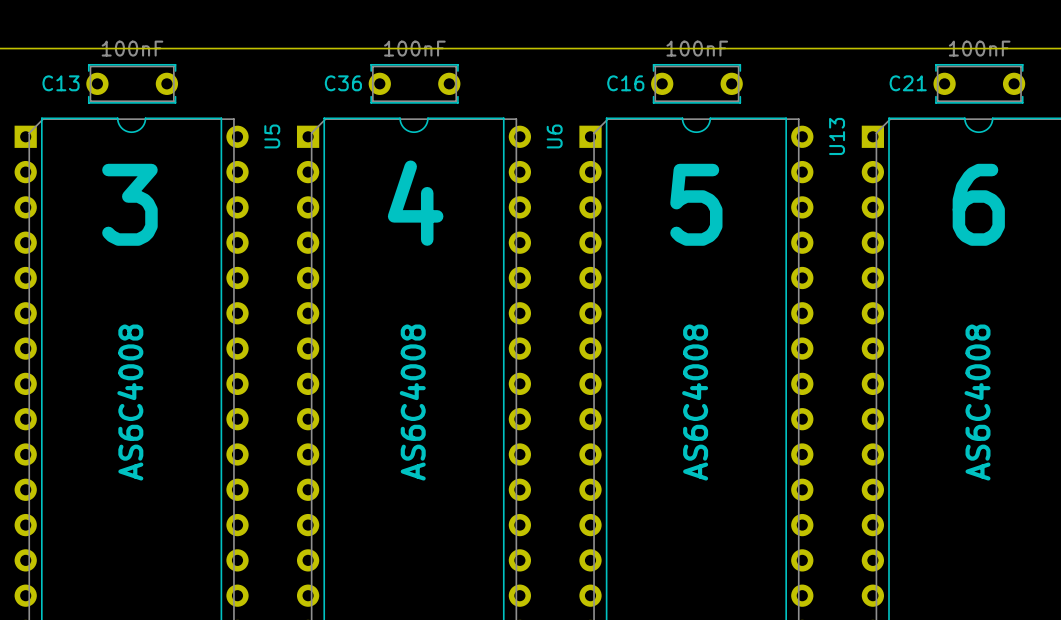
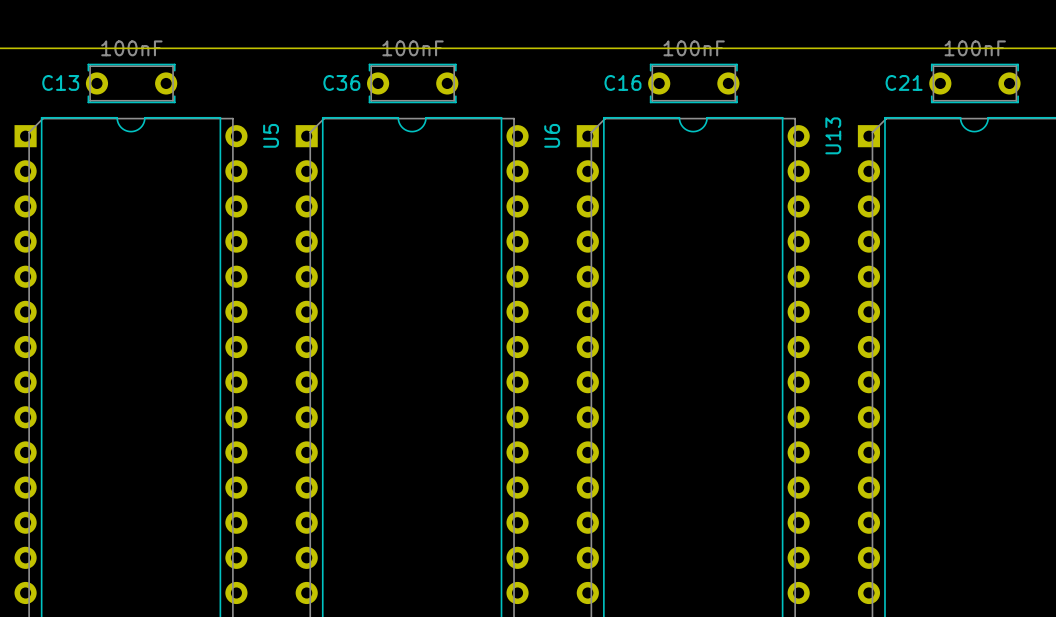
text: 4 (415, 203) -> none
text: 3 (129, 204) -> none
text: 5 (696, 204) -> none
text: 6 (978, 204) -> none
text: AS6C4008 (130, 402) -> none
text: AS6C4008 (412, 402) -> none
text: AS6C4008 (695, 402) -> none
text: AS6C4008 (977, 402) -> none

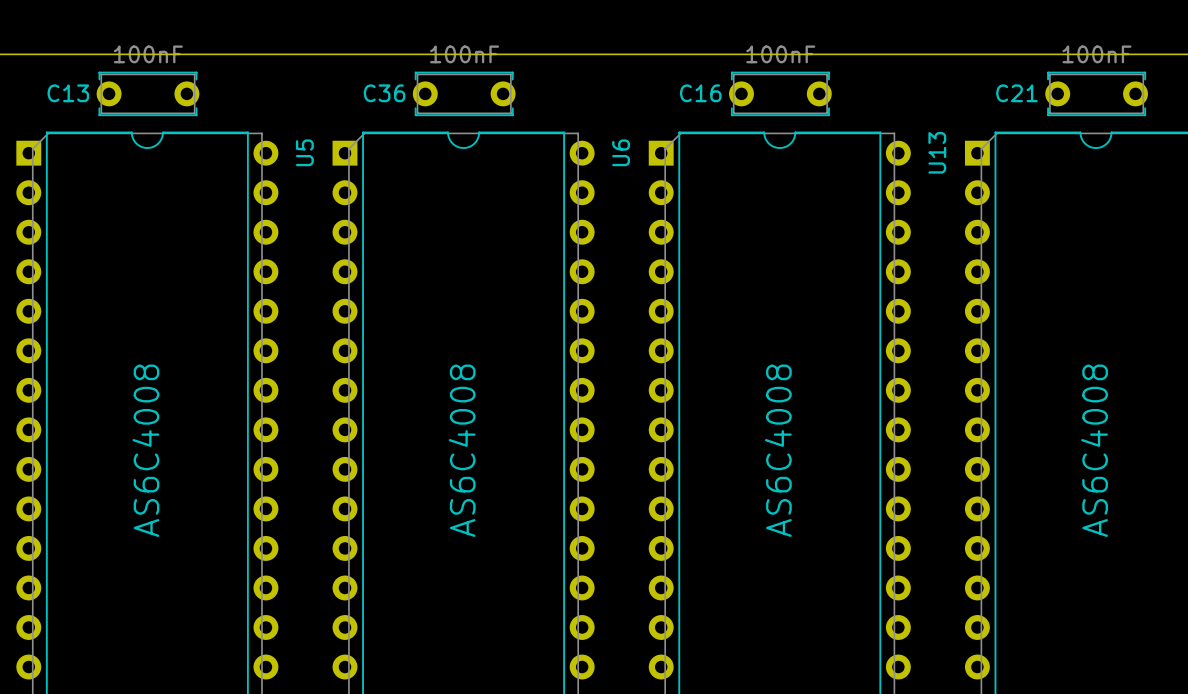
text: none -> AS6C4008 (145, 450)
text: none -> AS6C4008 (462, 450)
text: none -> AS6C4008 (778, 450)
text: none -> AS6C4008 (1094, 450)

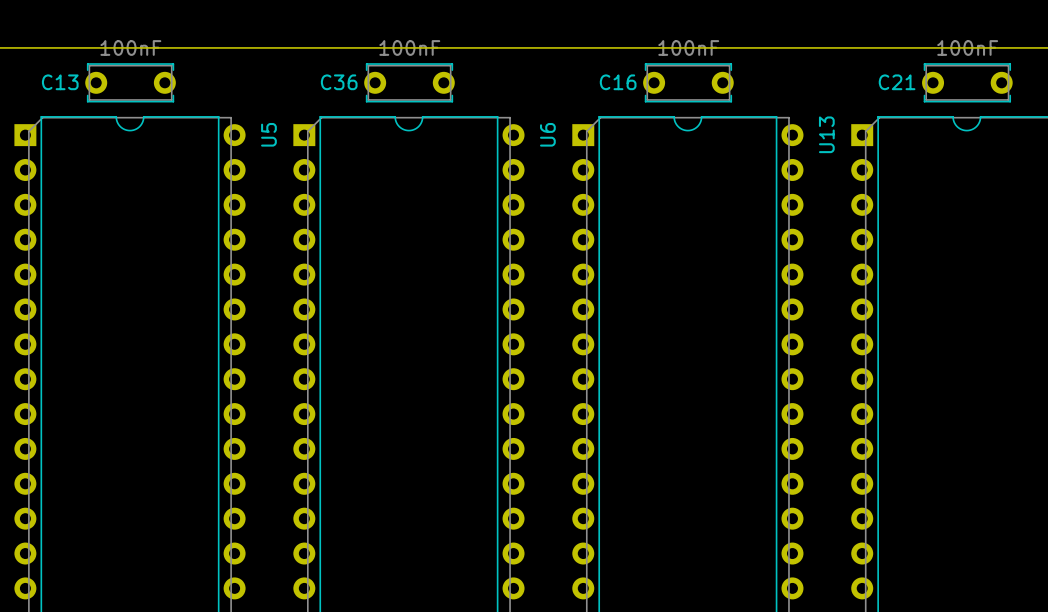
text: AS6C4008 (145, 450) -> none
text: AS6C4008 (462, 450) -> none
text: AS6C4008 (778, 450) -> none
text: AS6C4008 (1094, 450) -> none

